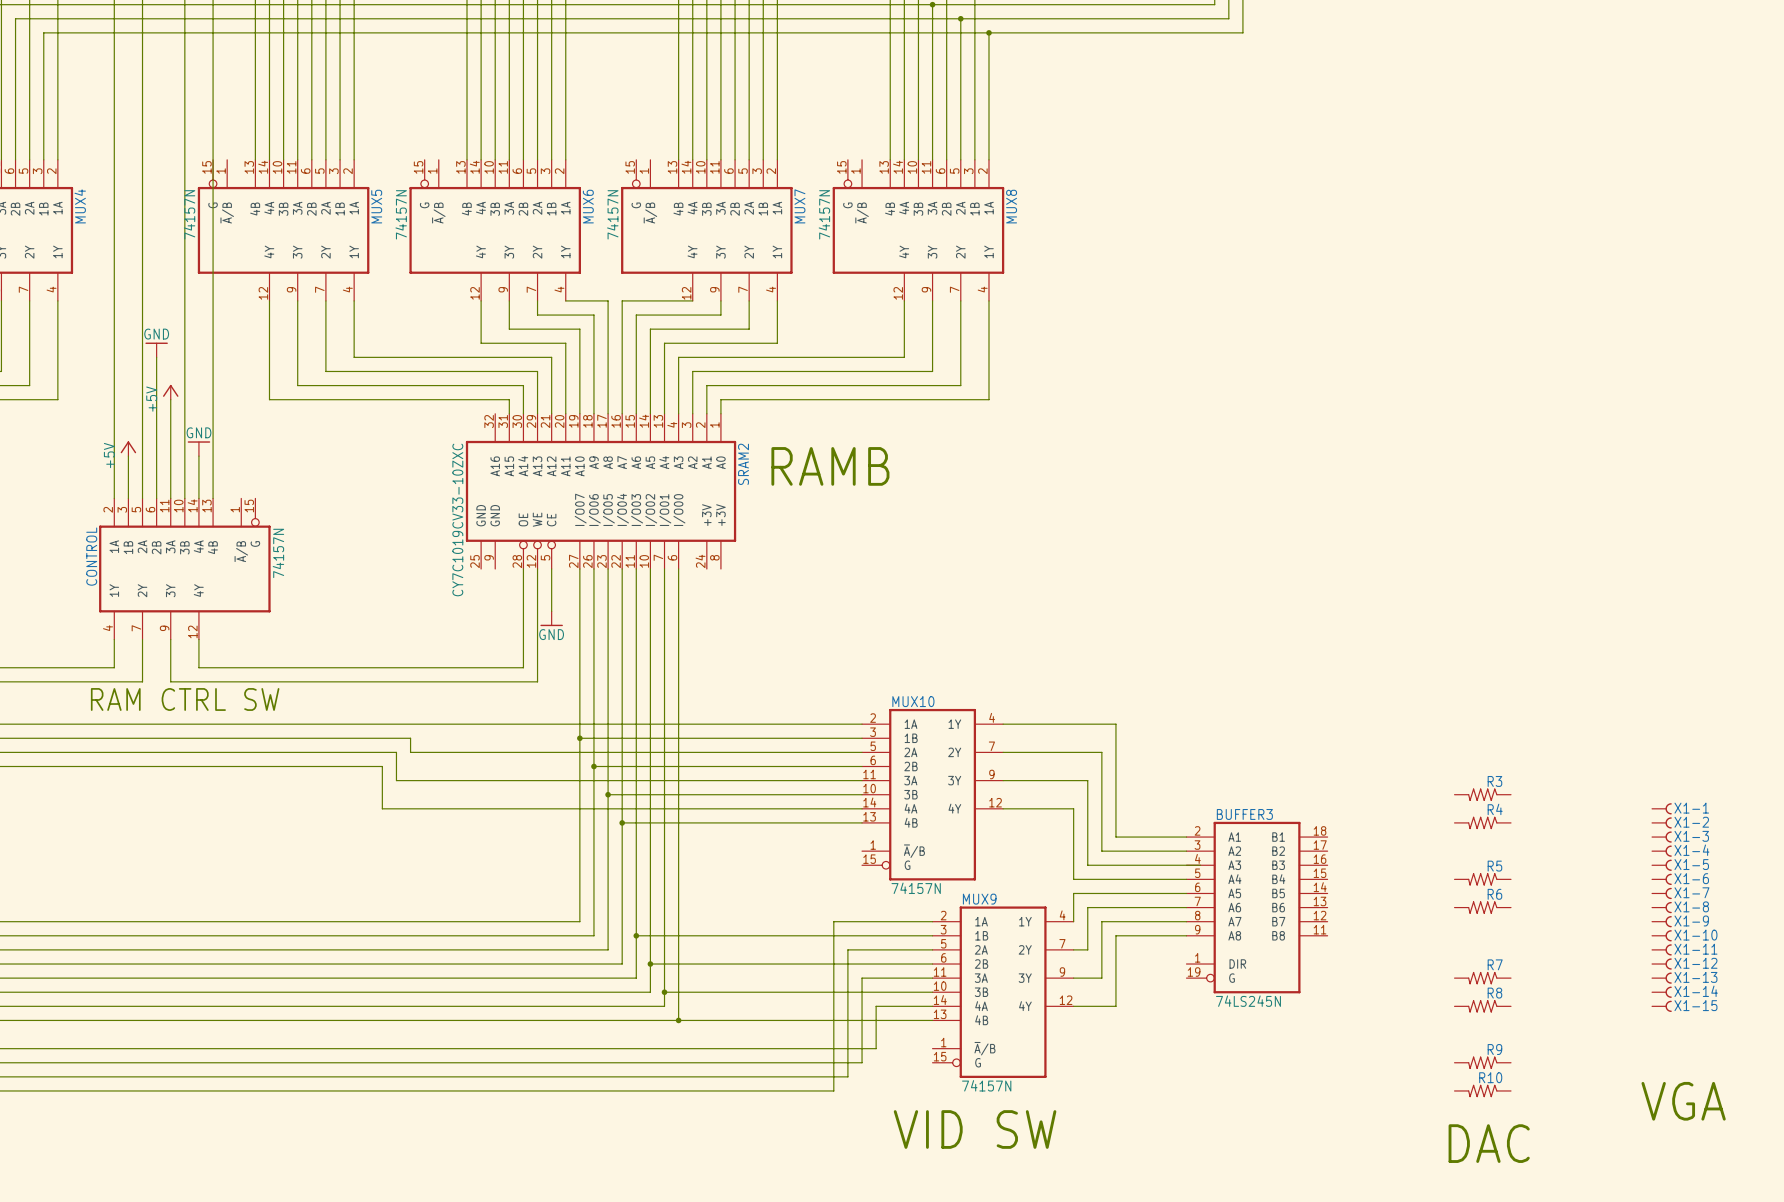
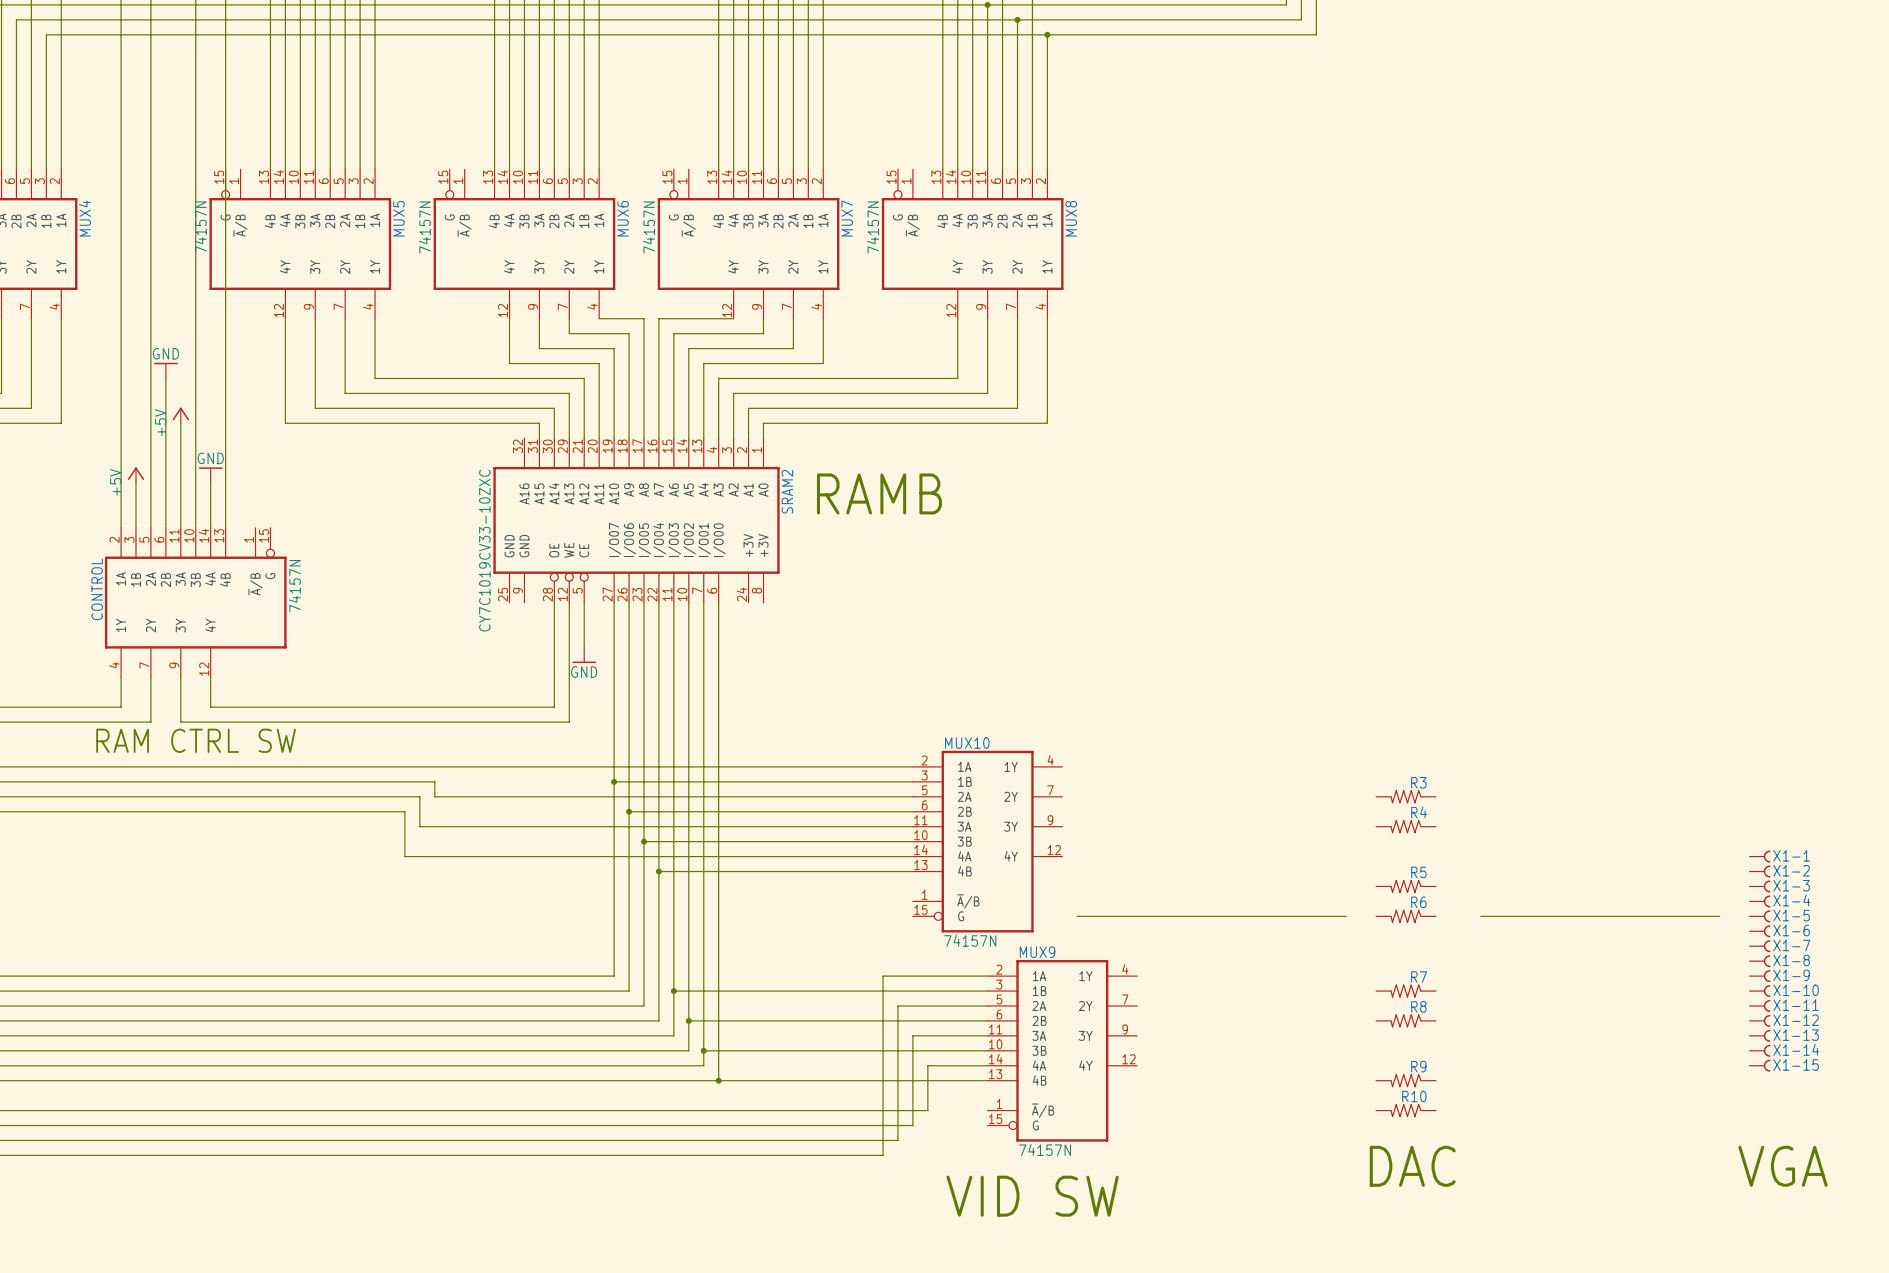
wire: (1003, 724) (1115, 724) (1115, 837) (1186, 837) -> none
wire: (1003, 752) (1101, 752) (1101, 851) (1186, 851) -> none
wire: (1003, 780) (1087, 780) (1087, 865) -> (1077, 916) (1151, 916)
R3 position: (1482, 794) -> (1405, 796)
wire: (1003, 808) (1073, 808) (1073, 879) (1186, 879) -> none
R4 position: (1482, 822) -> (1405, 826)
wire: none -> (1271, 916) (1346, 916)
wire: none -> (1480, 916) (1719, 916)
R5 position: (1482, 879) -> (1405, 886)
wire: (1186, 893) (1073, 893) (1073, 921) -> none
wire: (1186, 907) (1087, 907) (1087, 949) (1073, 949) -> none
BUFFER3: 74LS245N (1257, 907) -> none
R6 position: (1482, 907) -> (1405, 916)
wire: (1186, 921) (1101, 921) (1101, 978) (1073, 978) -> none
wire: (1186, 935) (1115, 935) (1115, 1006) (1073, 1006) -> none
R7 position: (1482, 978) -> (1405, 991)
R8 position: (1482, 1006) -> (1405, 1020)
R9 position: (1482, 1062) -> (1405, 1080)
R10 position: (1482, 1090) -> (1405, 1110)
text: none -> DAC (1412, 1166)
text: DAC (1489, 1143) -> none

